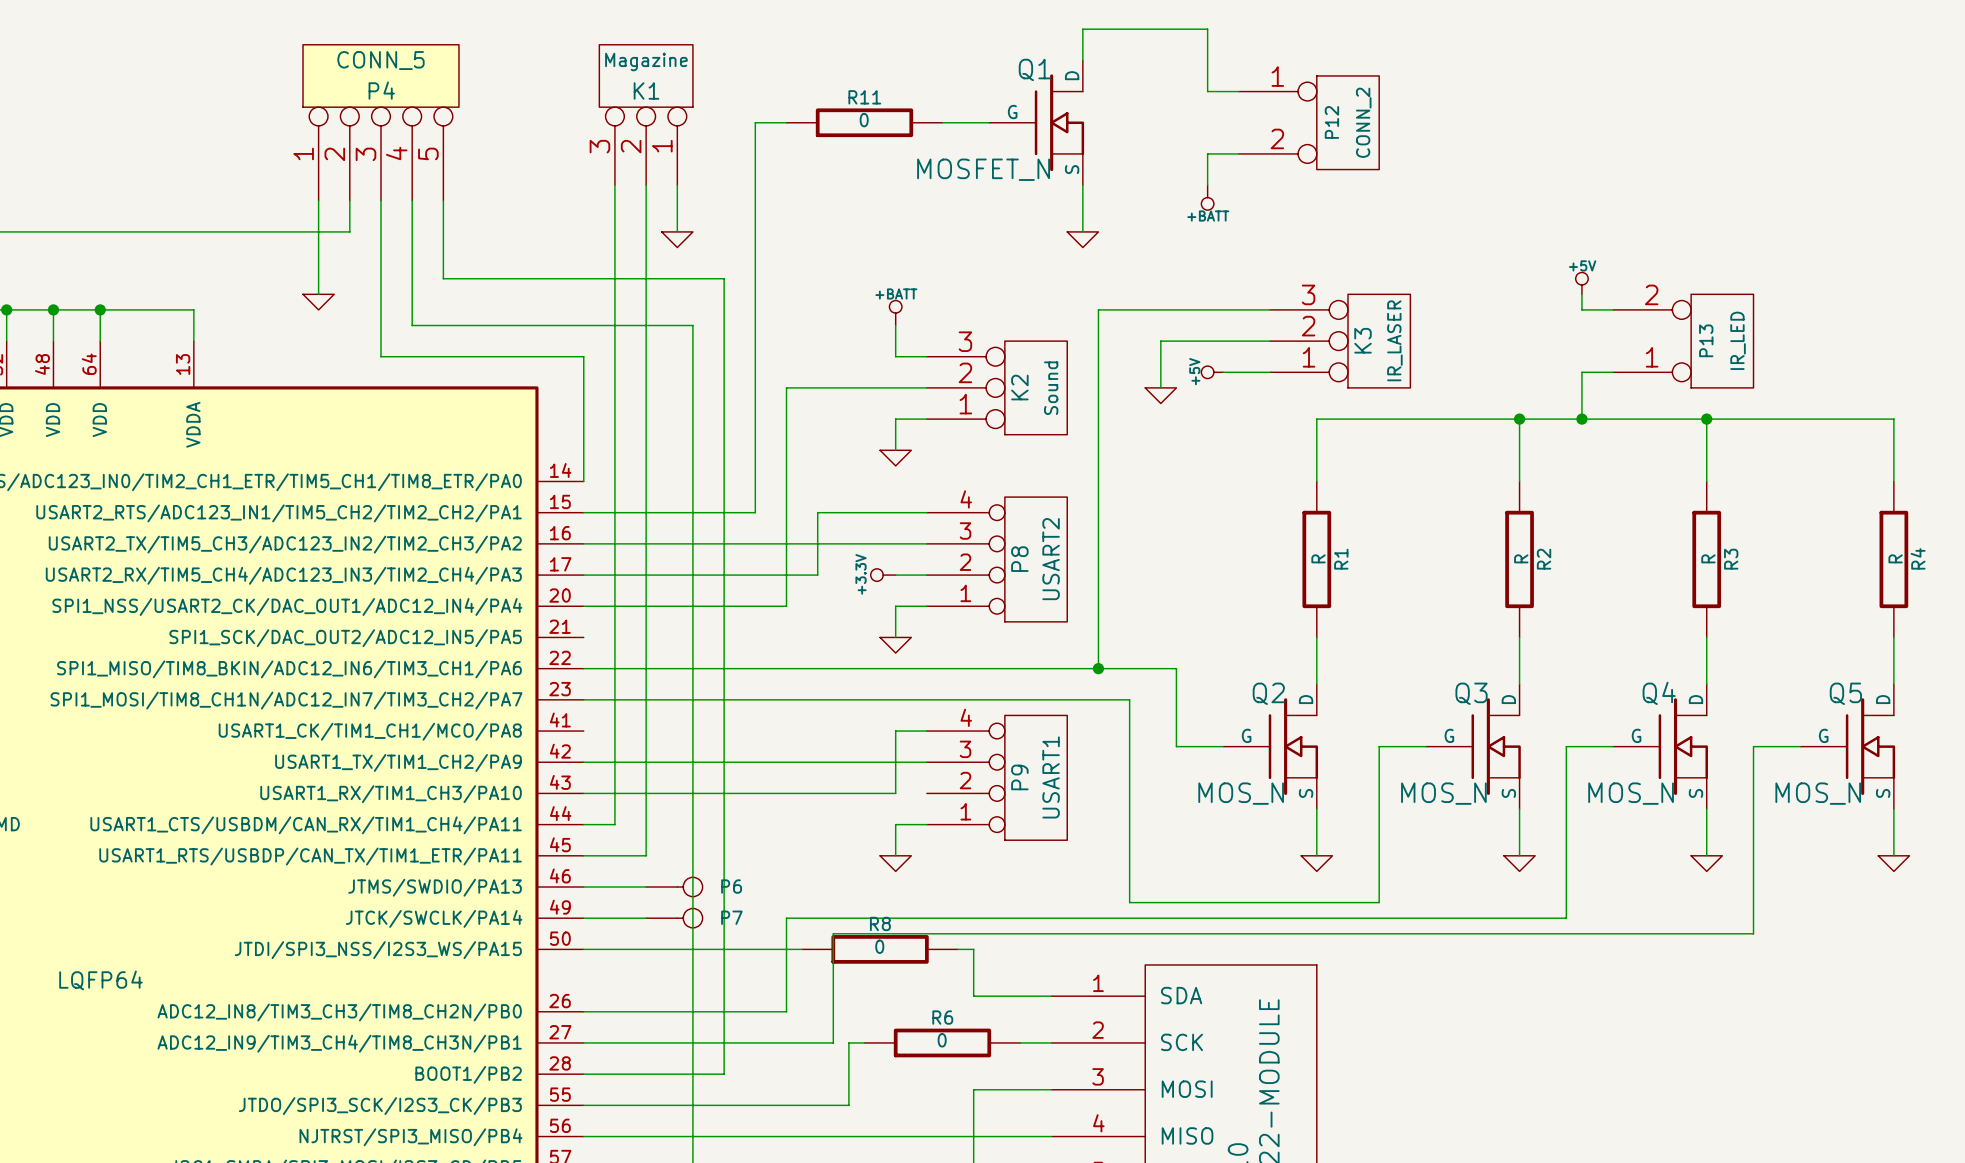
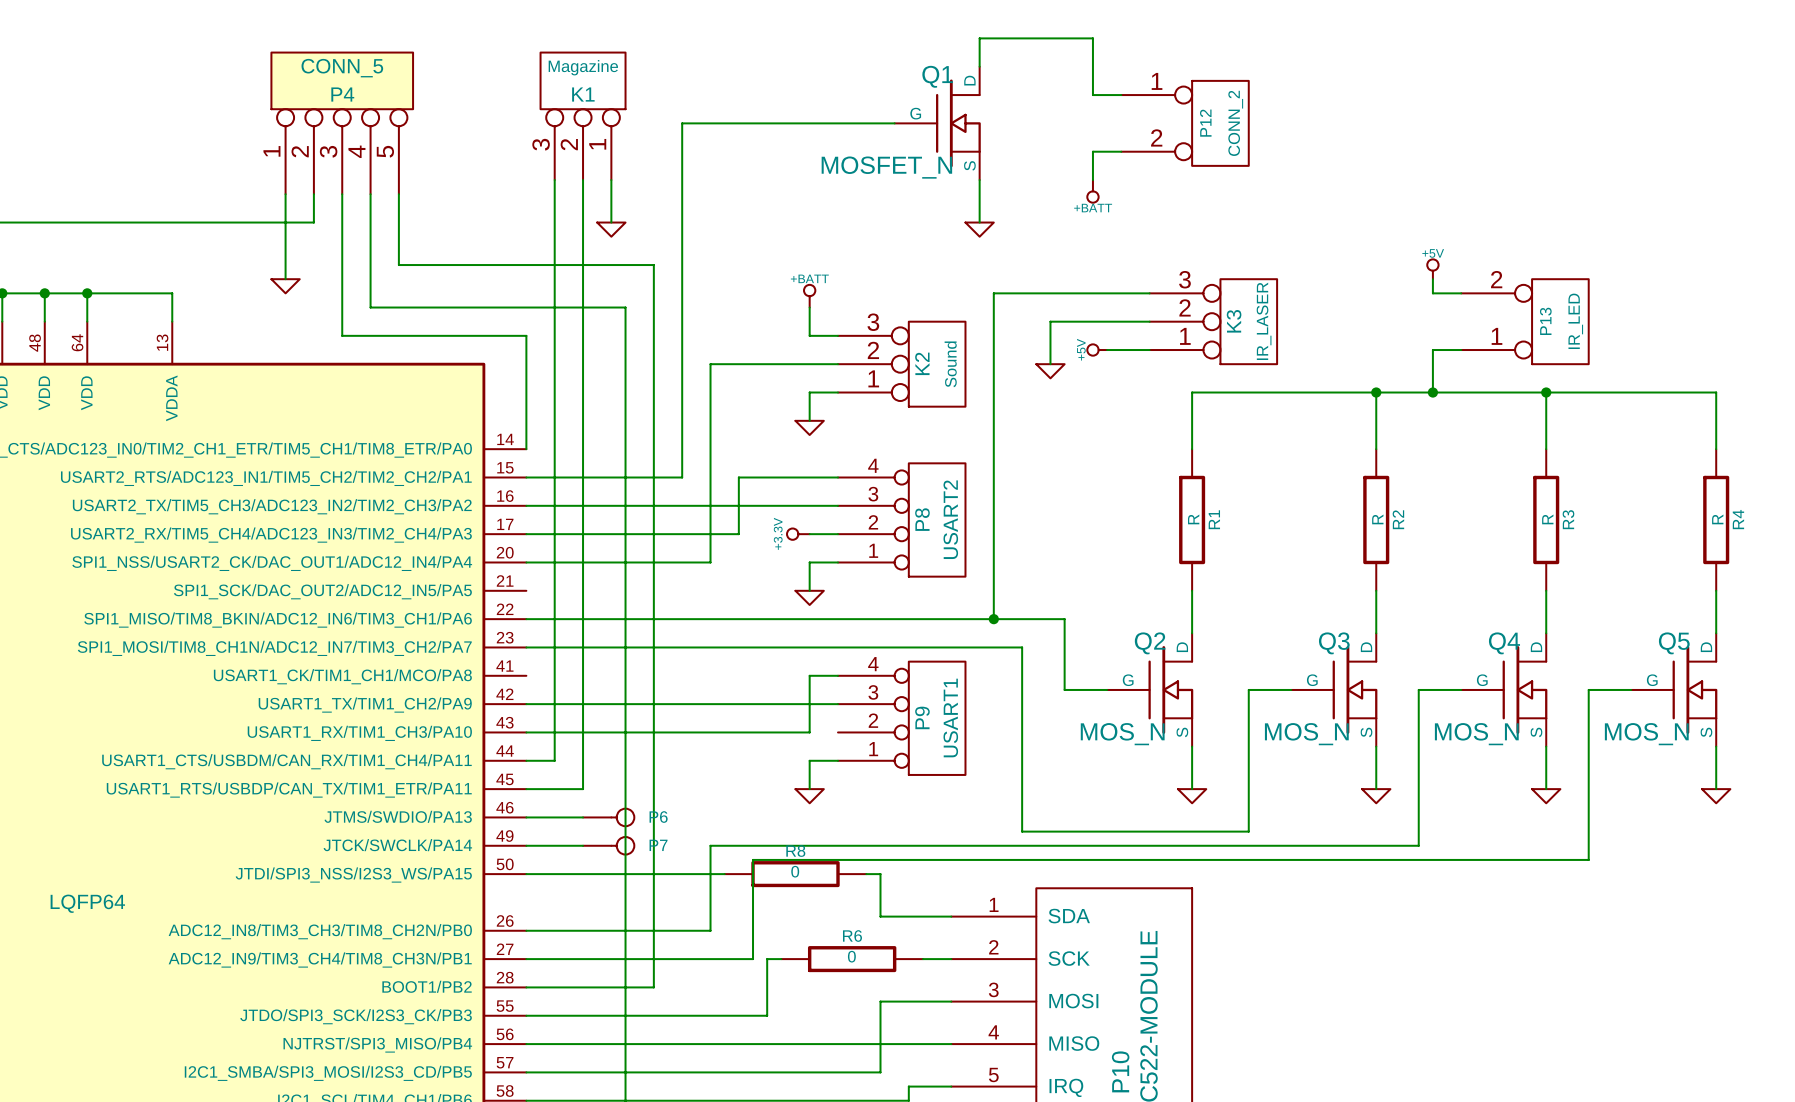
wire: none -> (710, 123) (852, 123)
R11: 0 (864, 122) -> none

